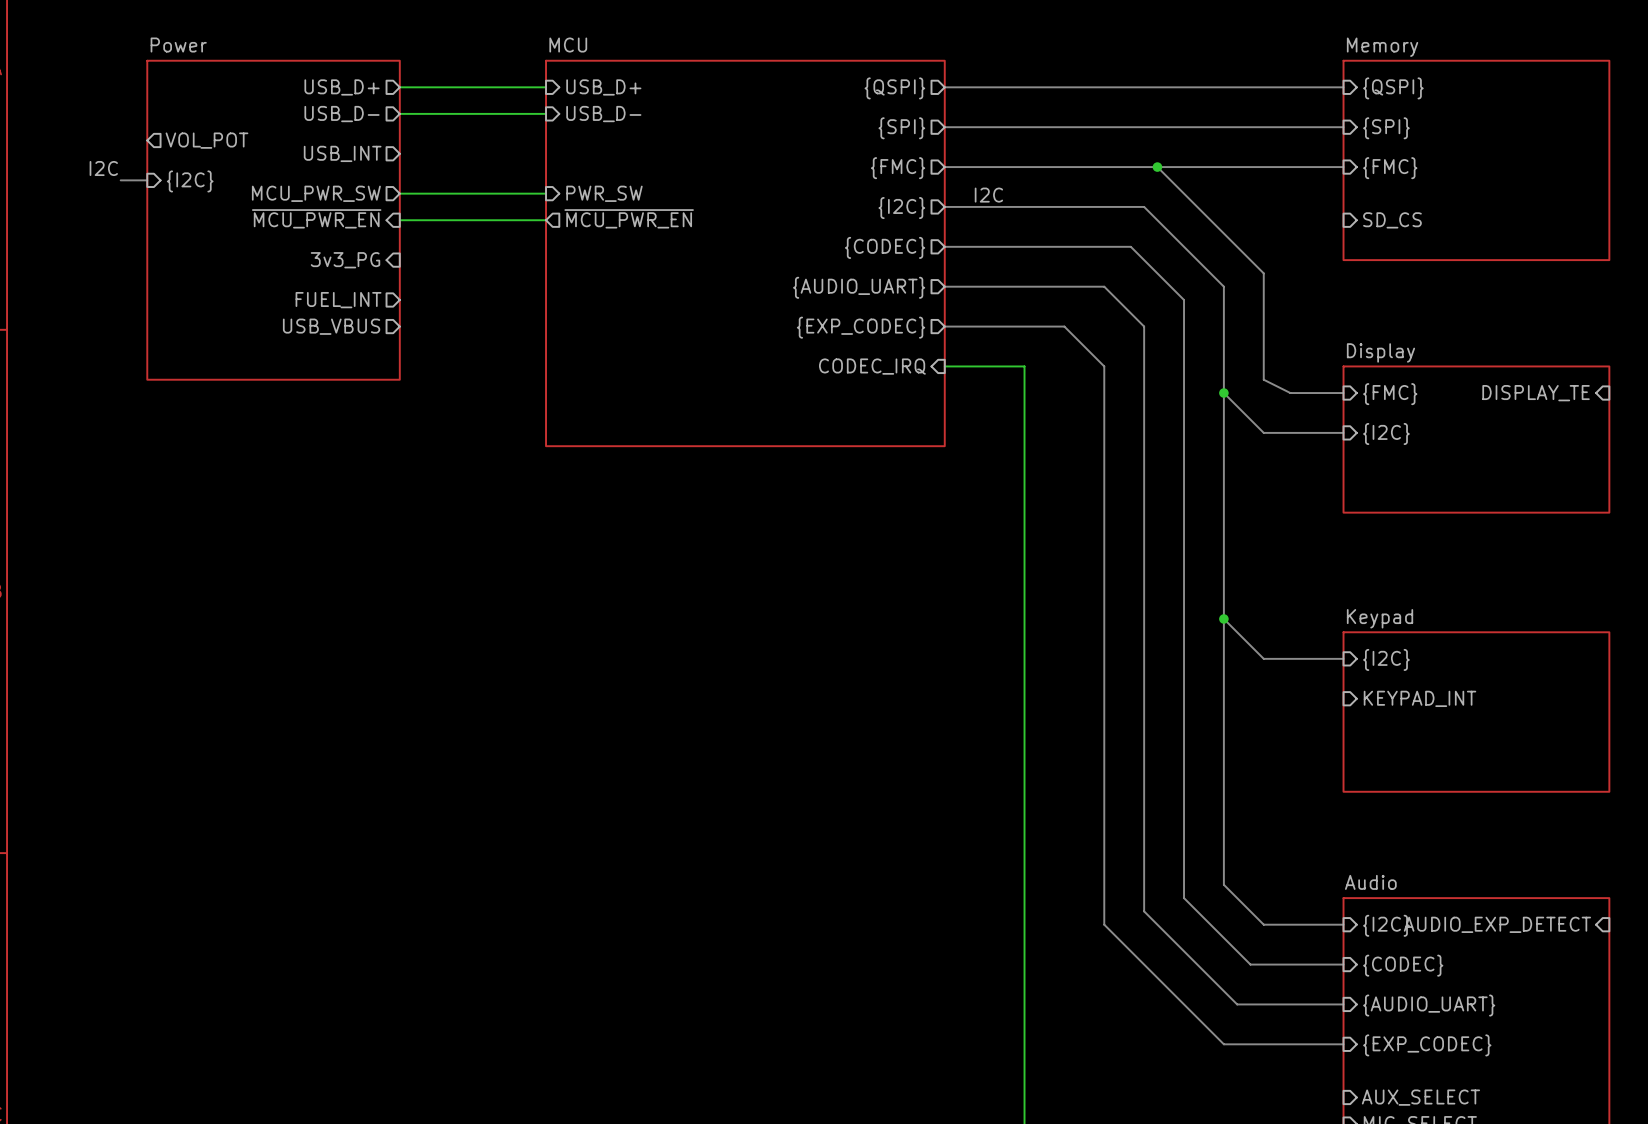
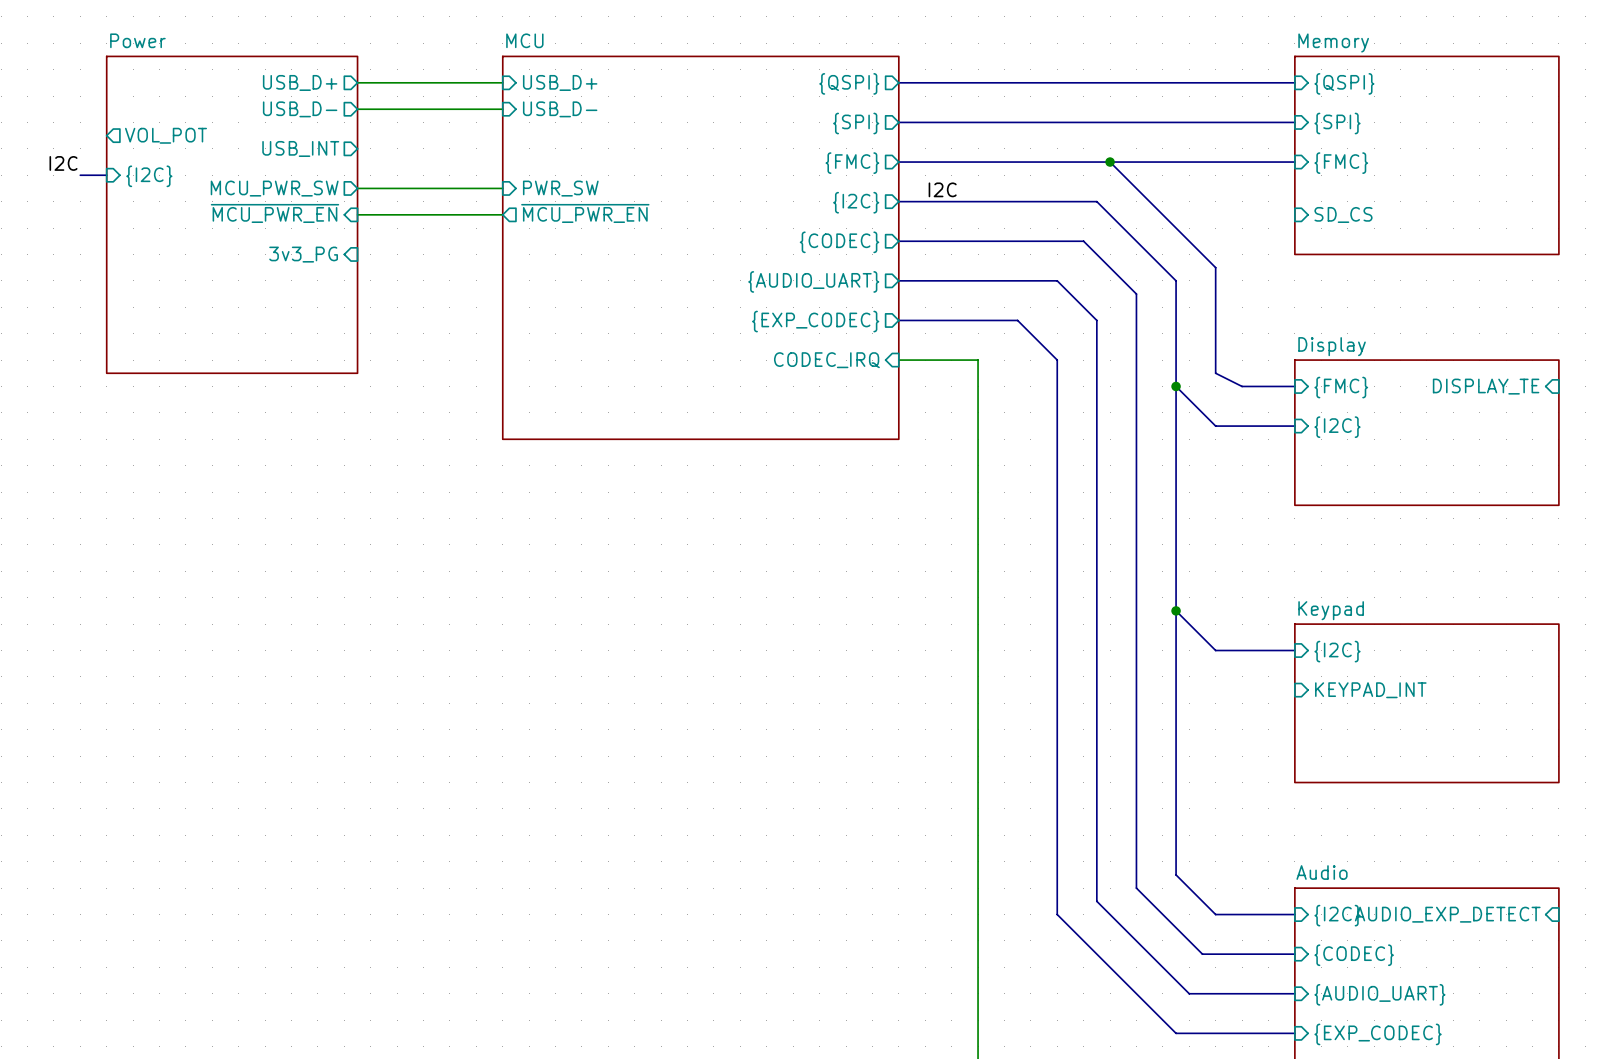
sheet pin: FUEL_INT (338, 300) -> none
sheet pin: USB_VBUS (331, 326) -> none

